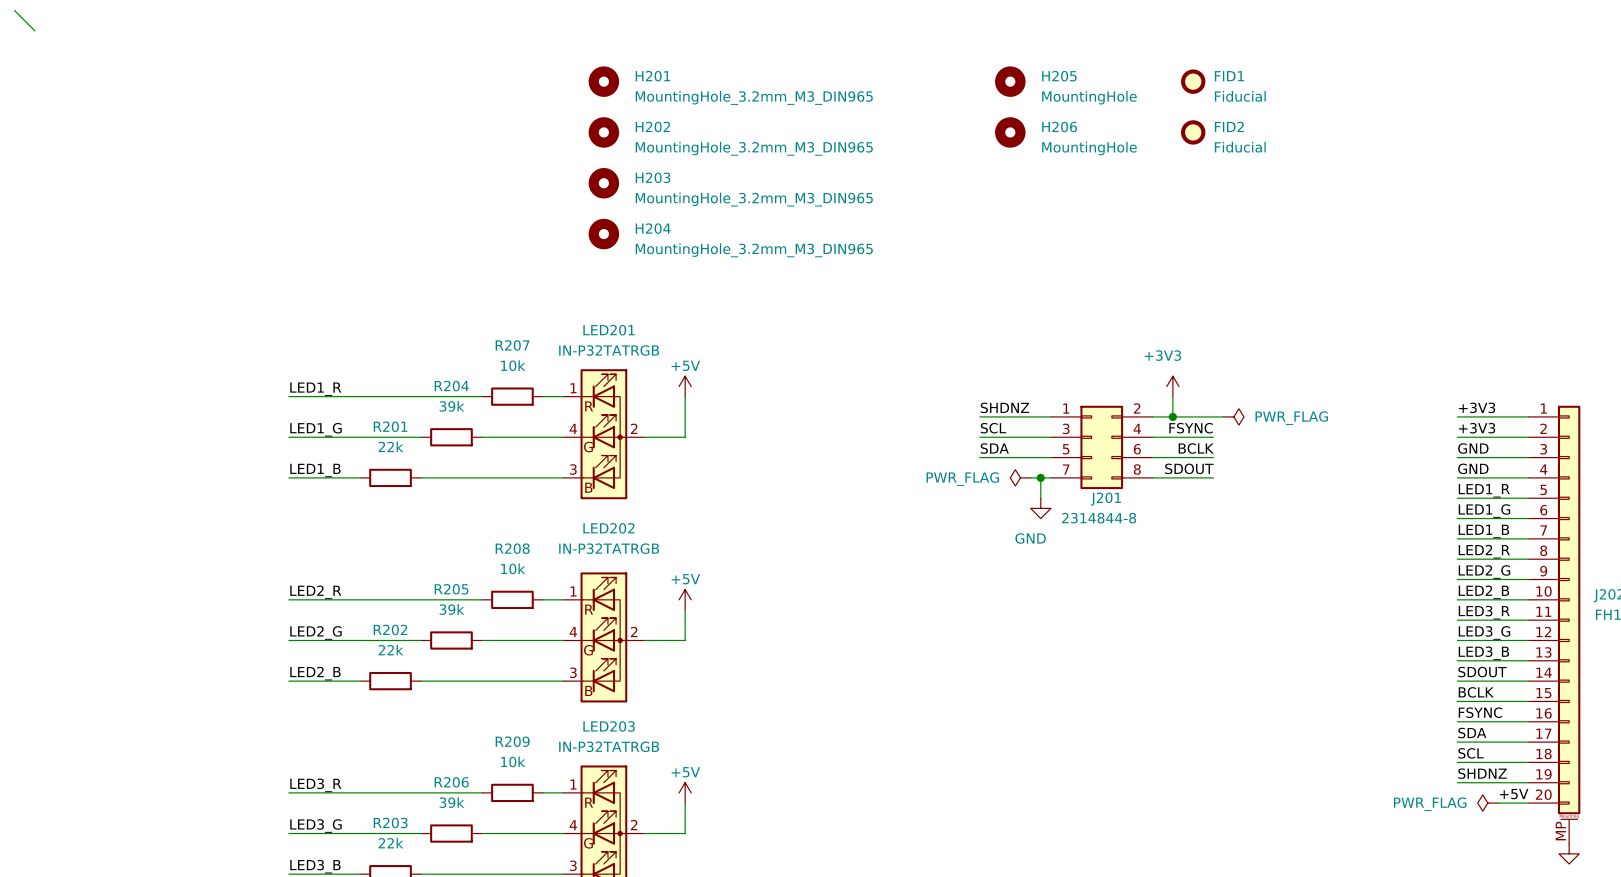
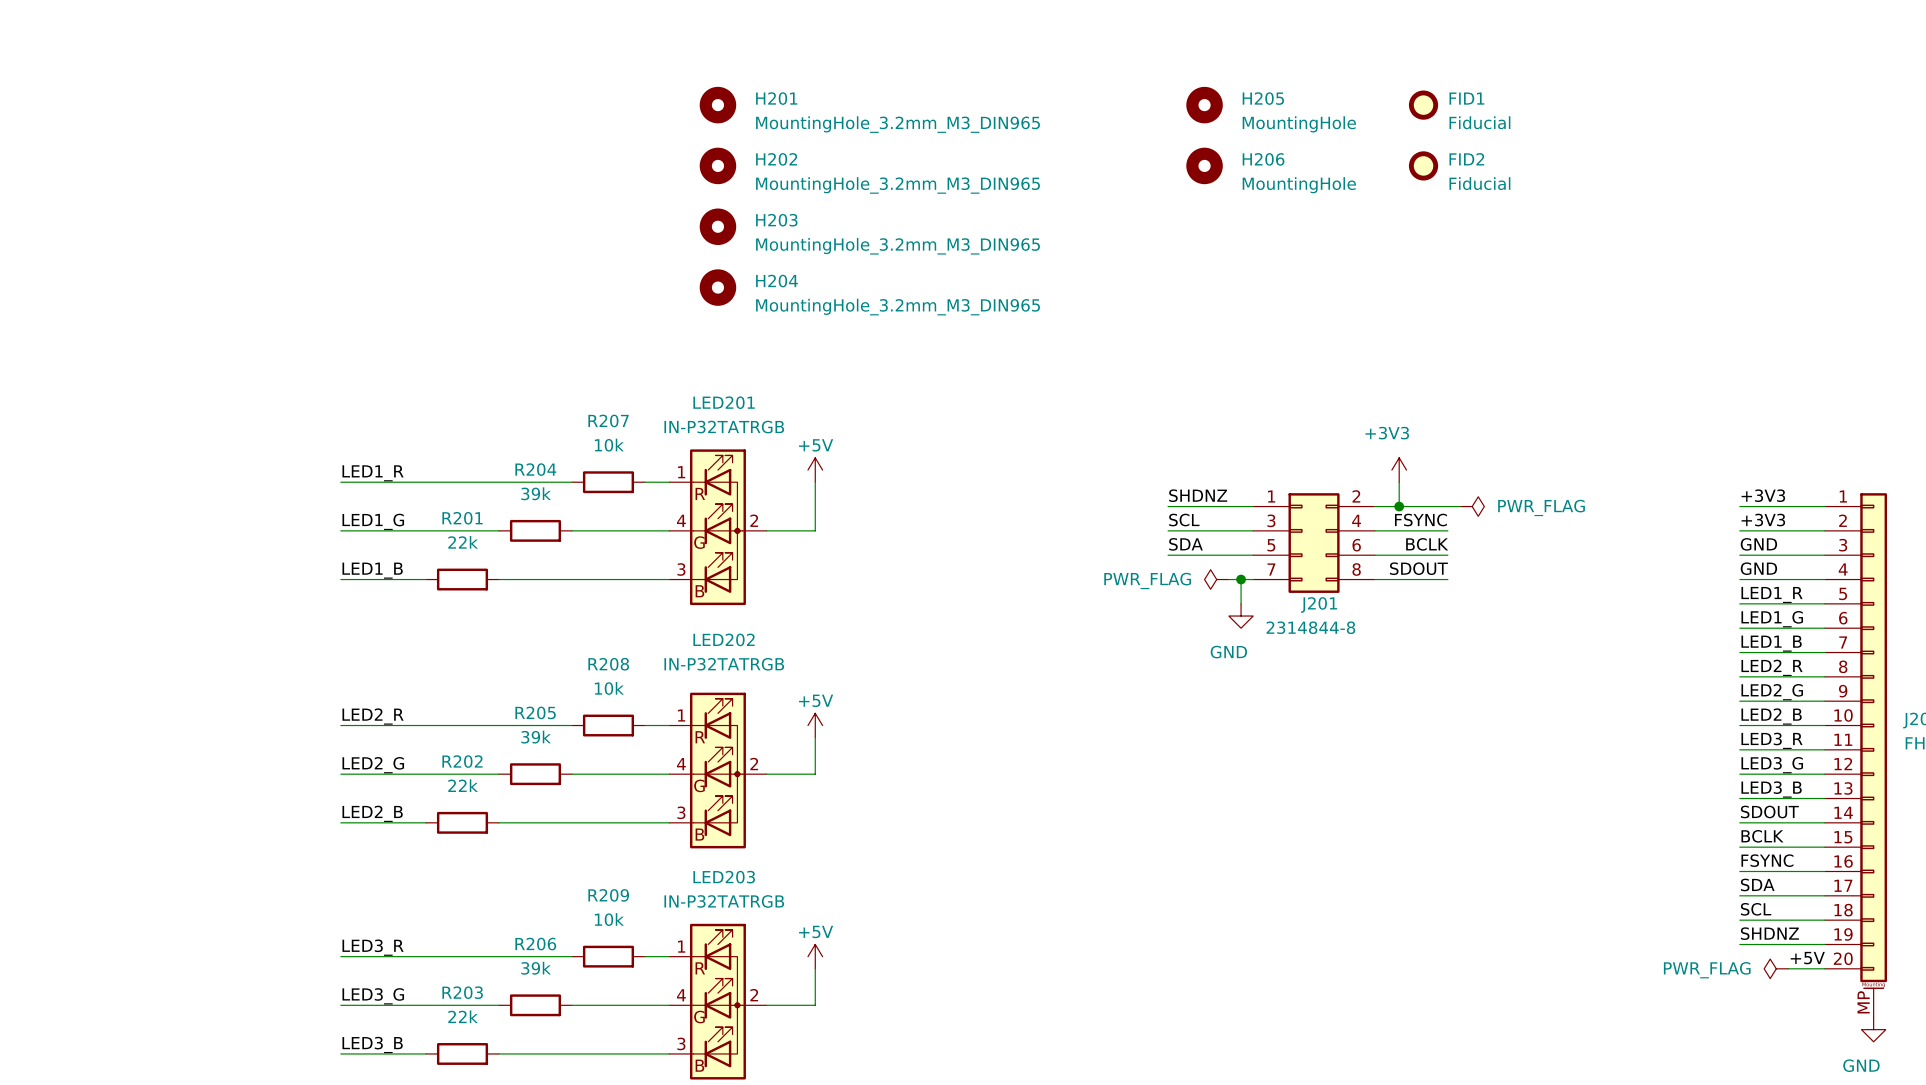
wire: (14, 10) (34, 30) -> none

